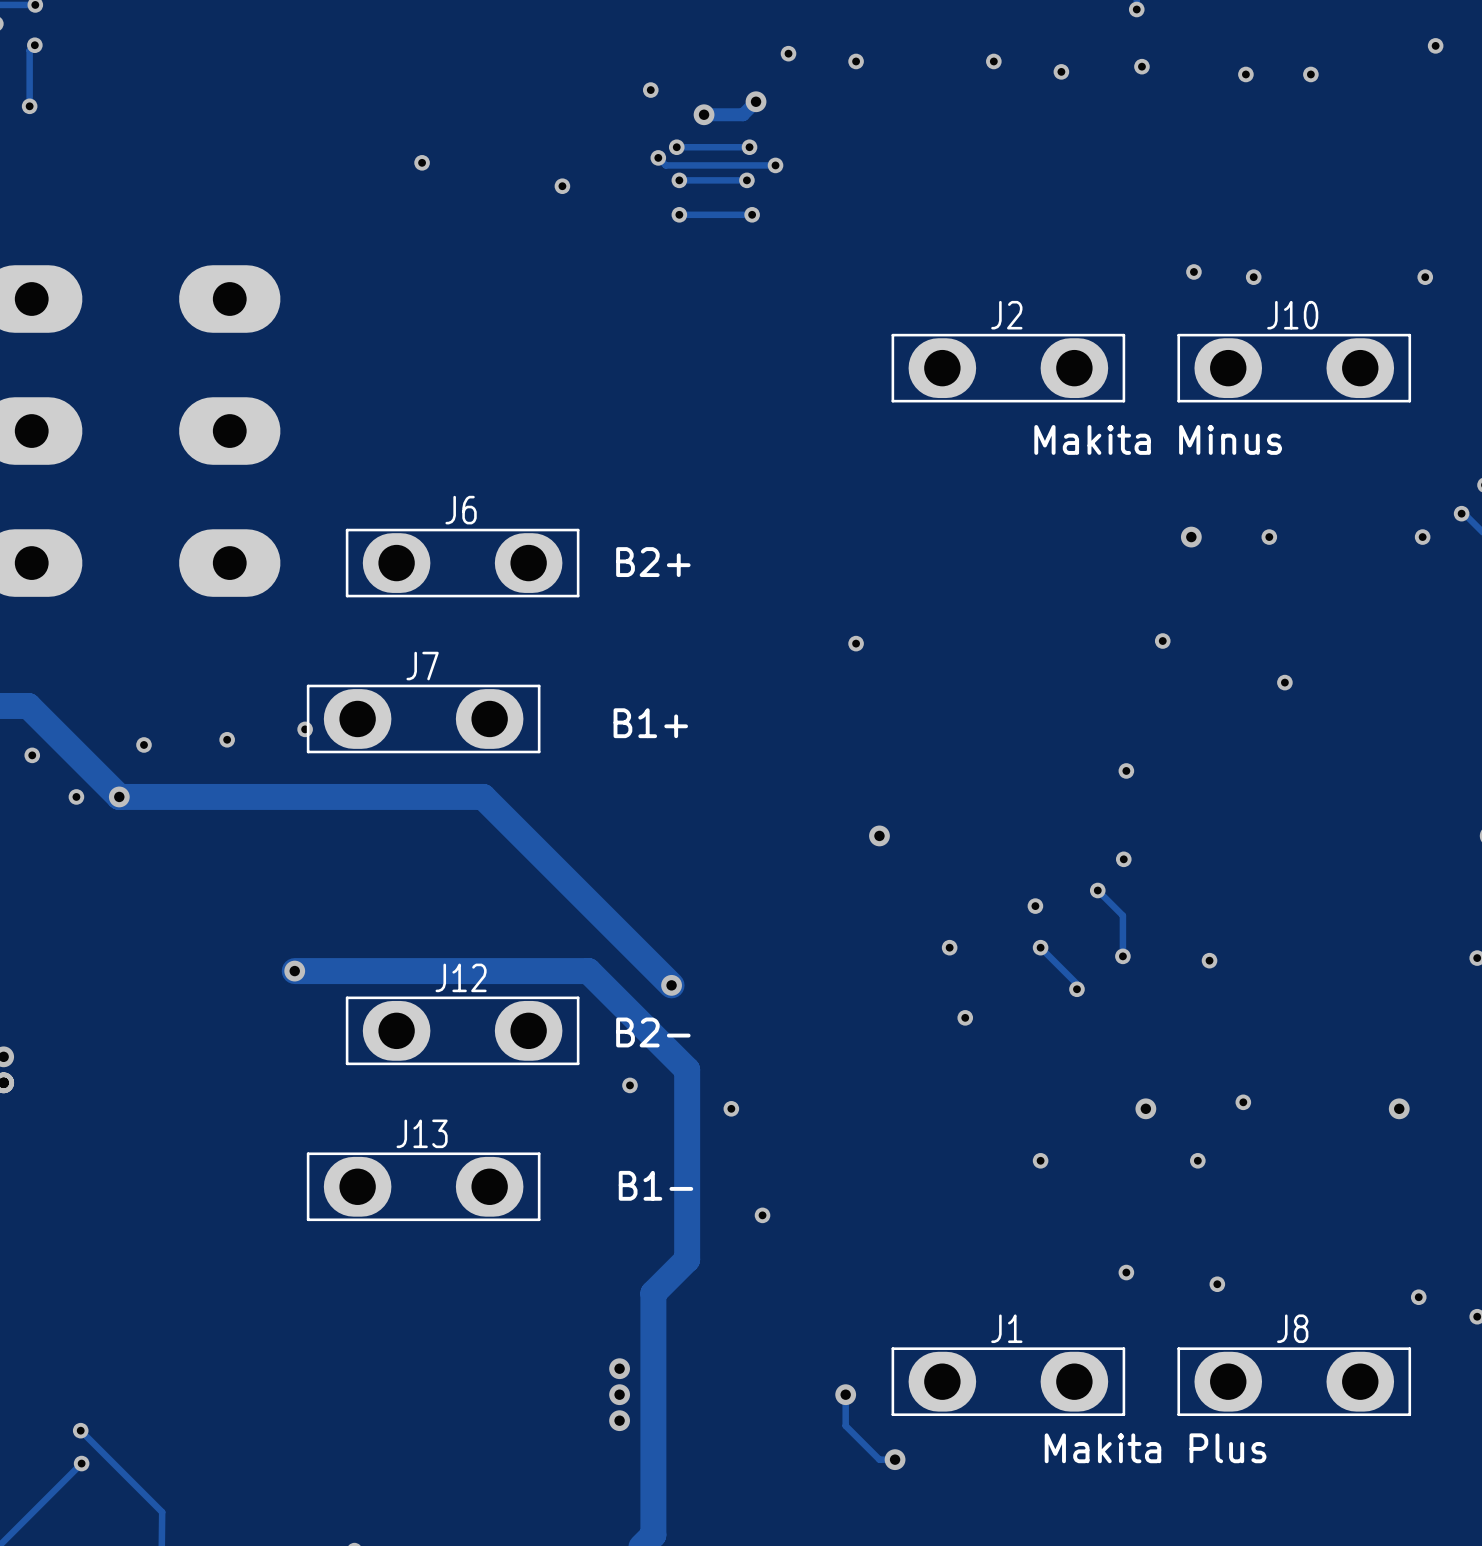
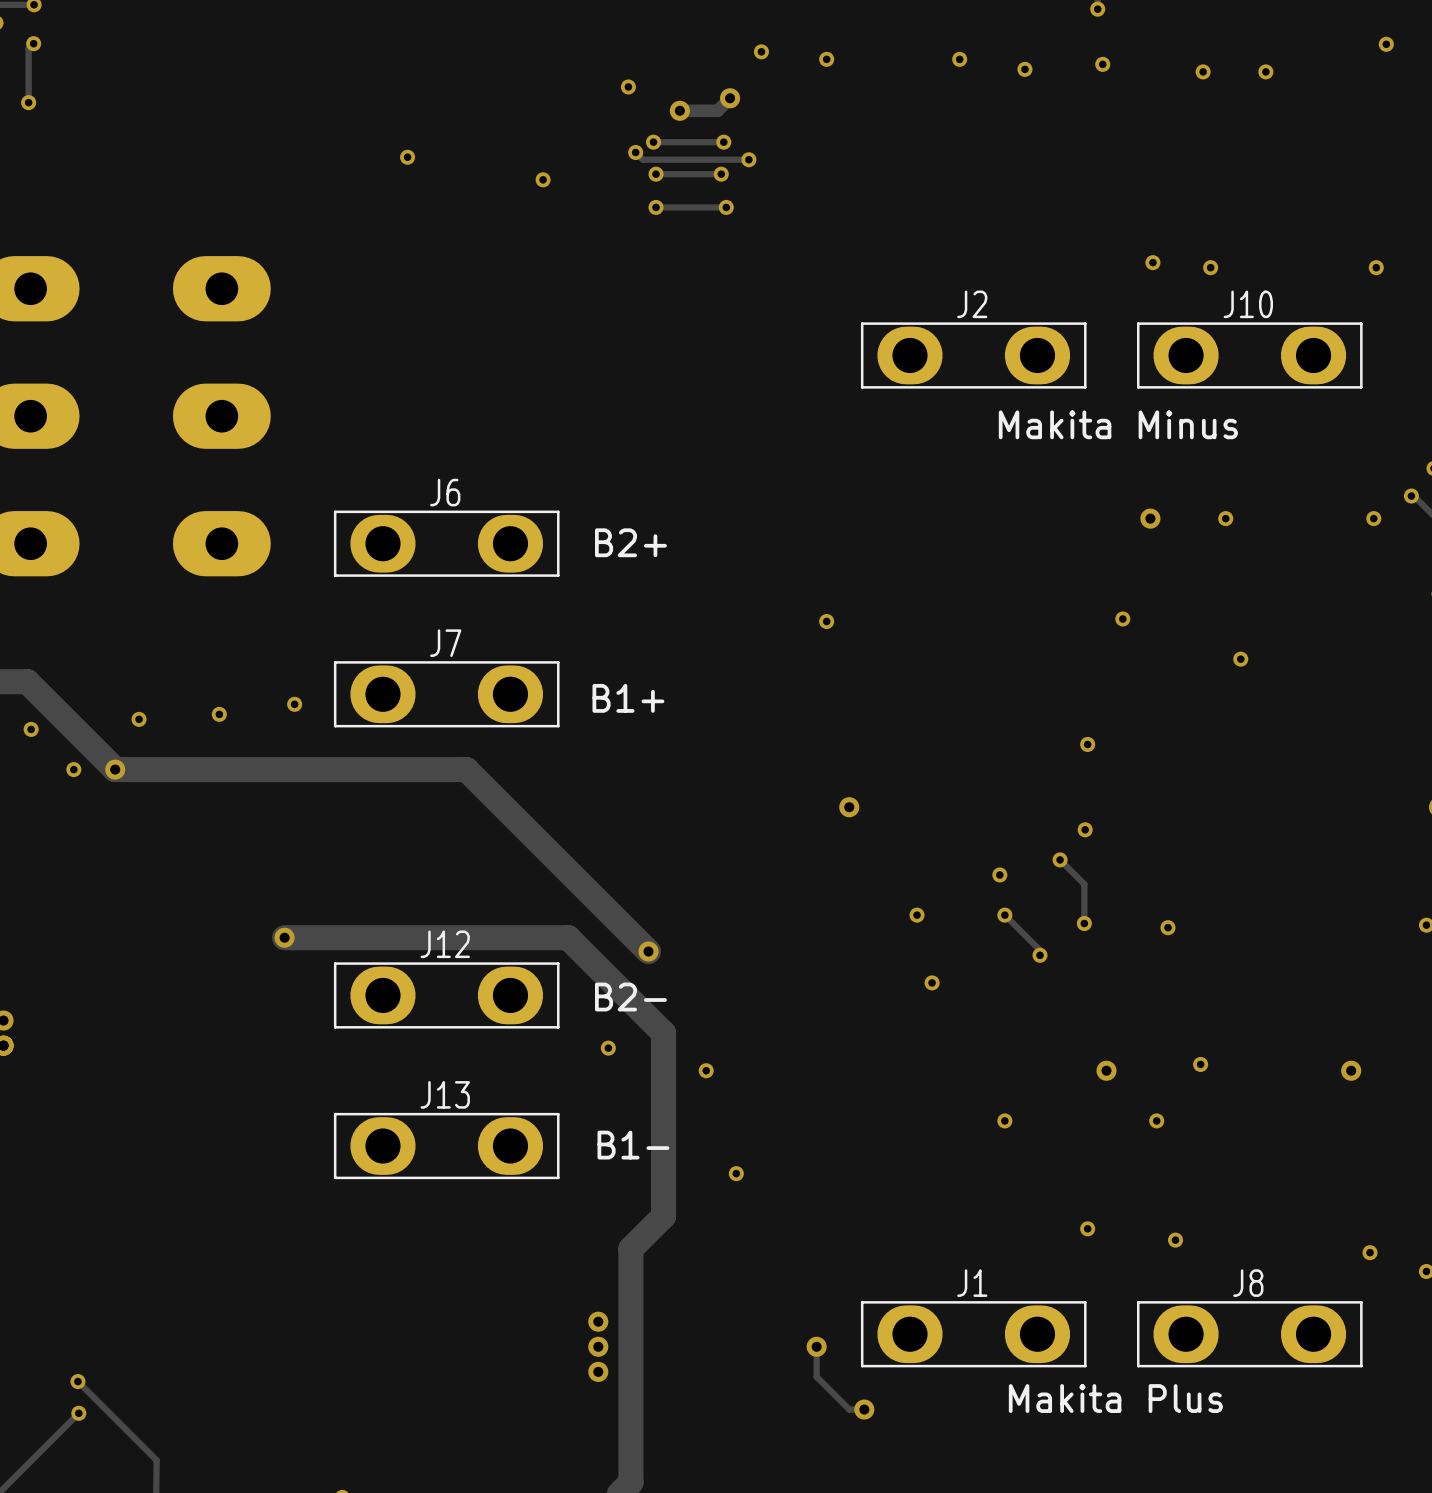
J7 position: (423, 718) -> (446, 694)
J13 position: (423, 1186) -> (446, 1146)

